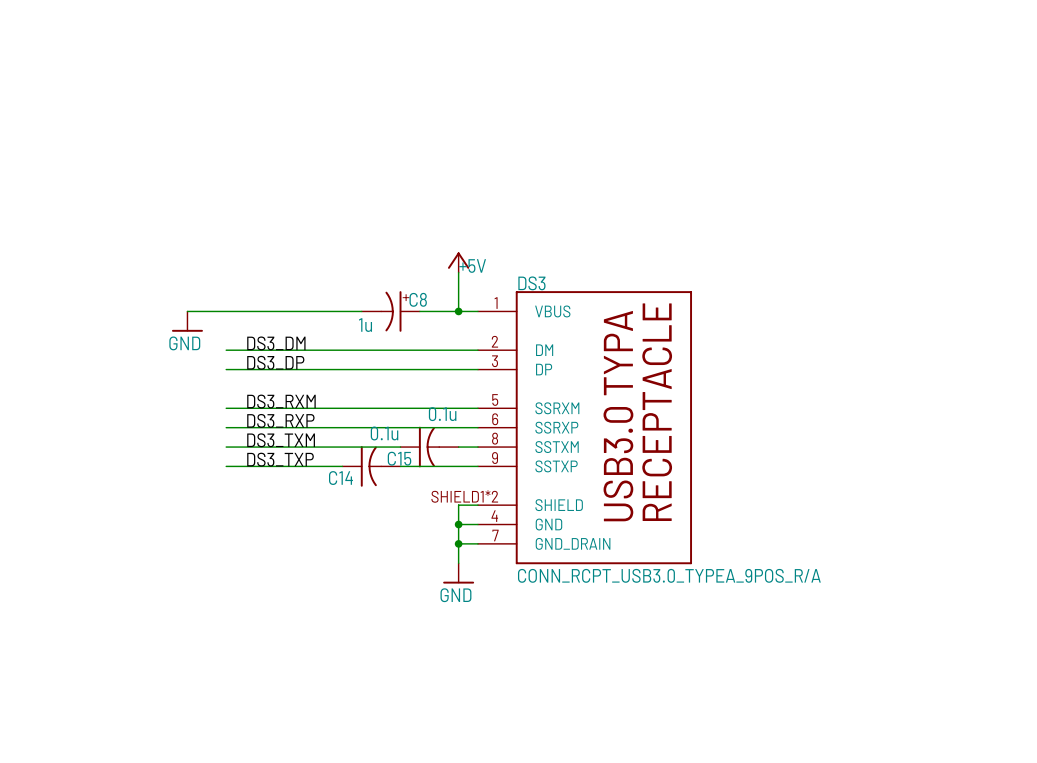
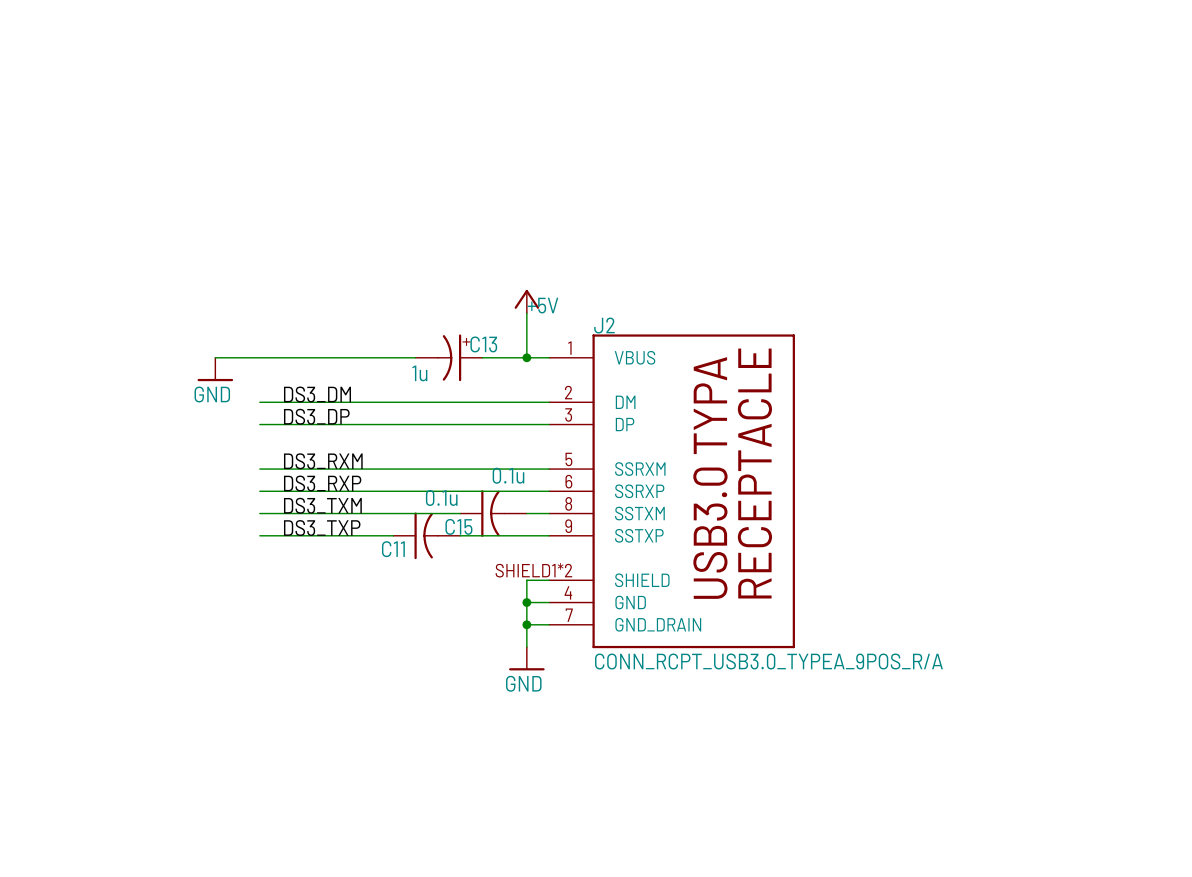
DS3 name: DS3 (531, 283) -> J2 (604, 325)
C8 name: C8 (418, 299) -> C13 (483, 344)
C14 name: C14 (340, 478) -> C11 (393, 549)

